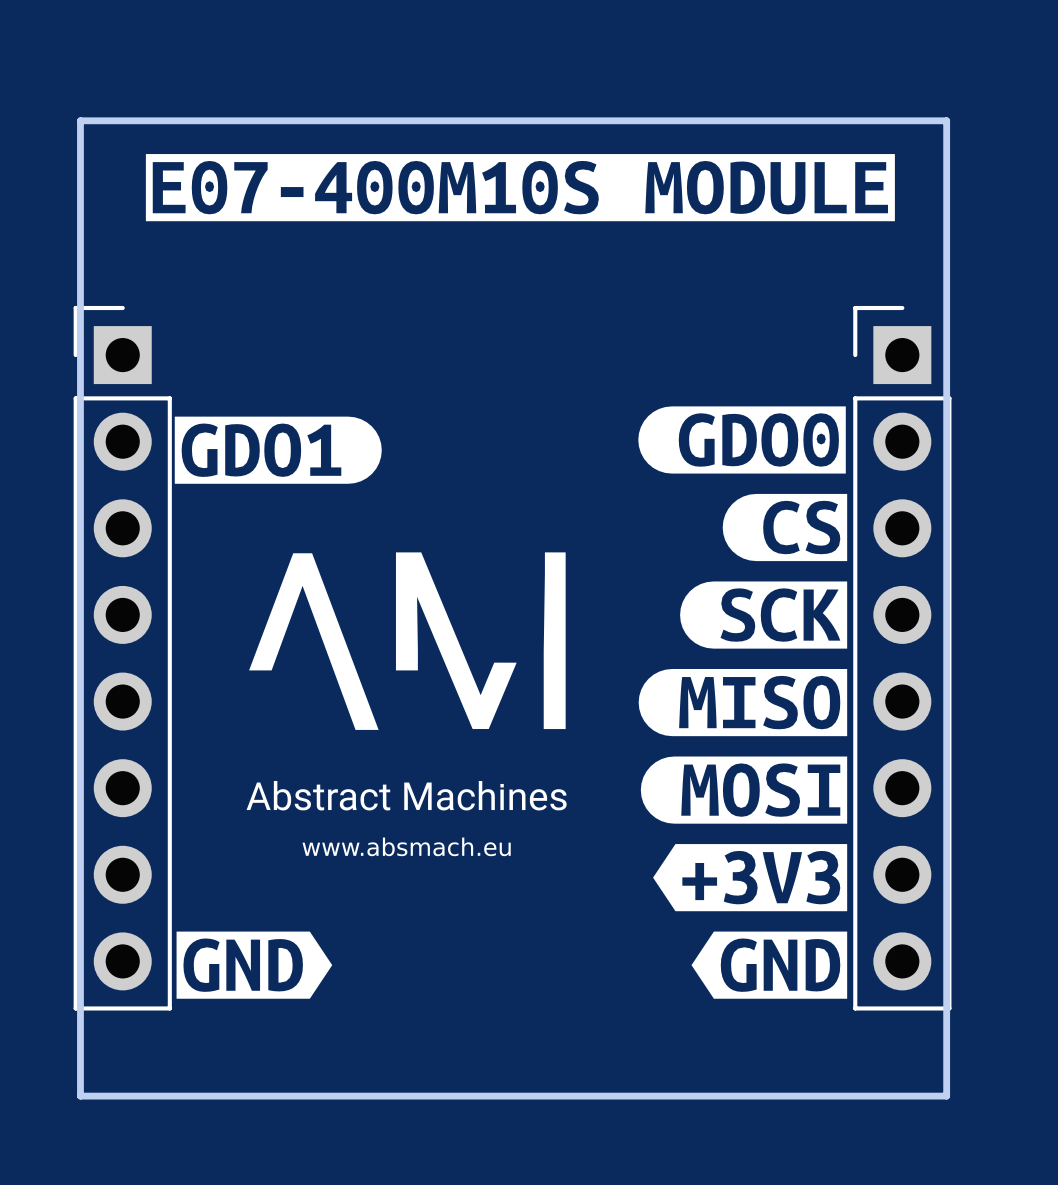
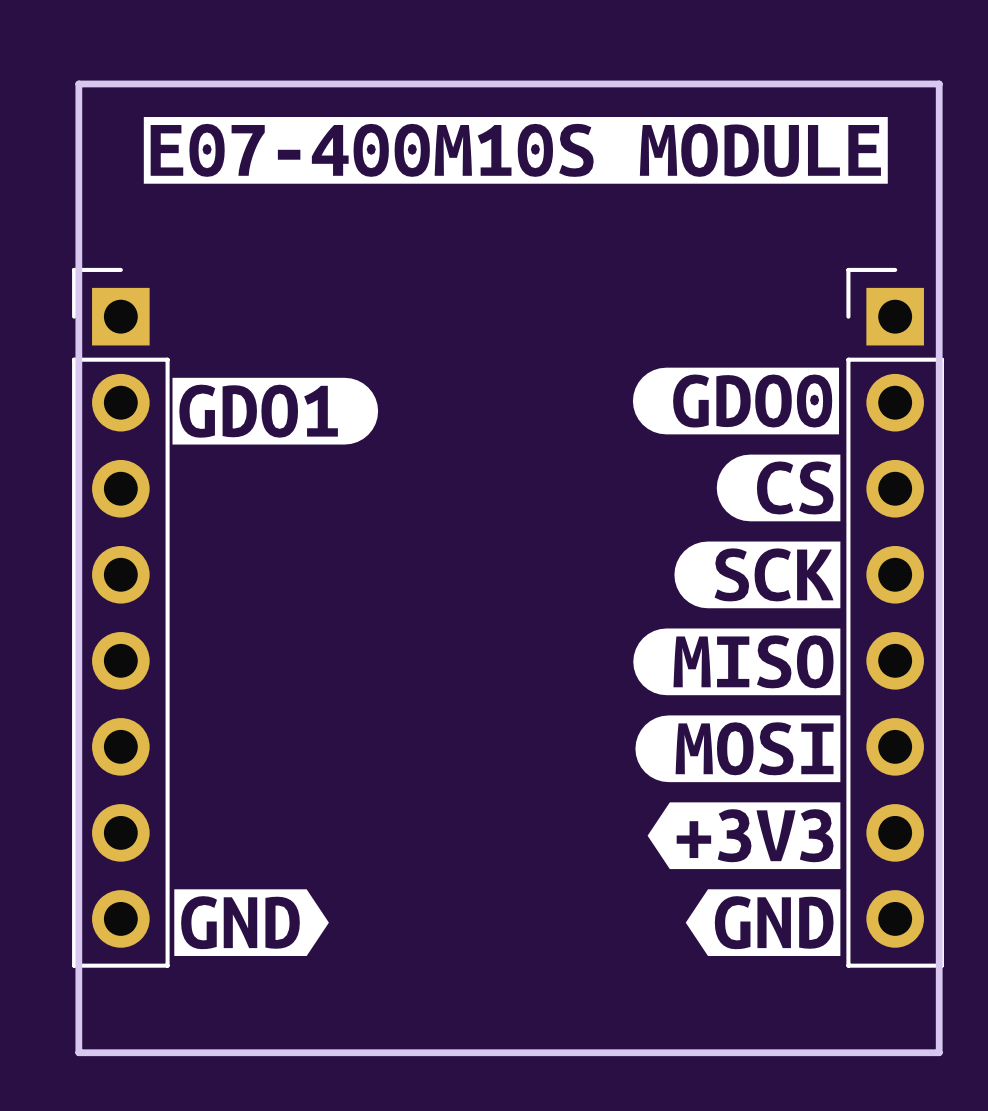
drawing: [249, 552, 566, 730] -> none
drawing: [246, 780, 567, 857] -> none

